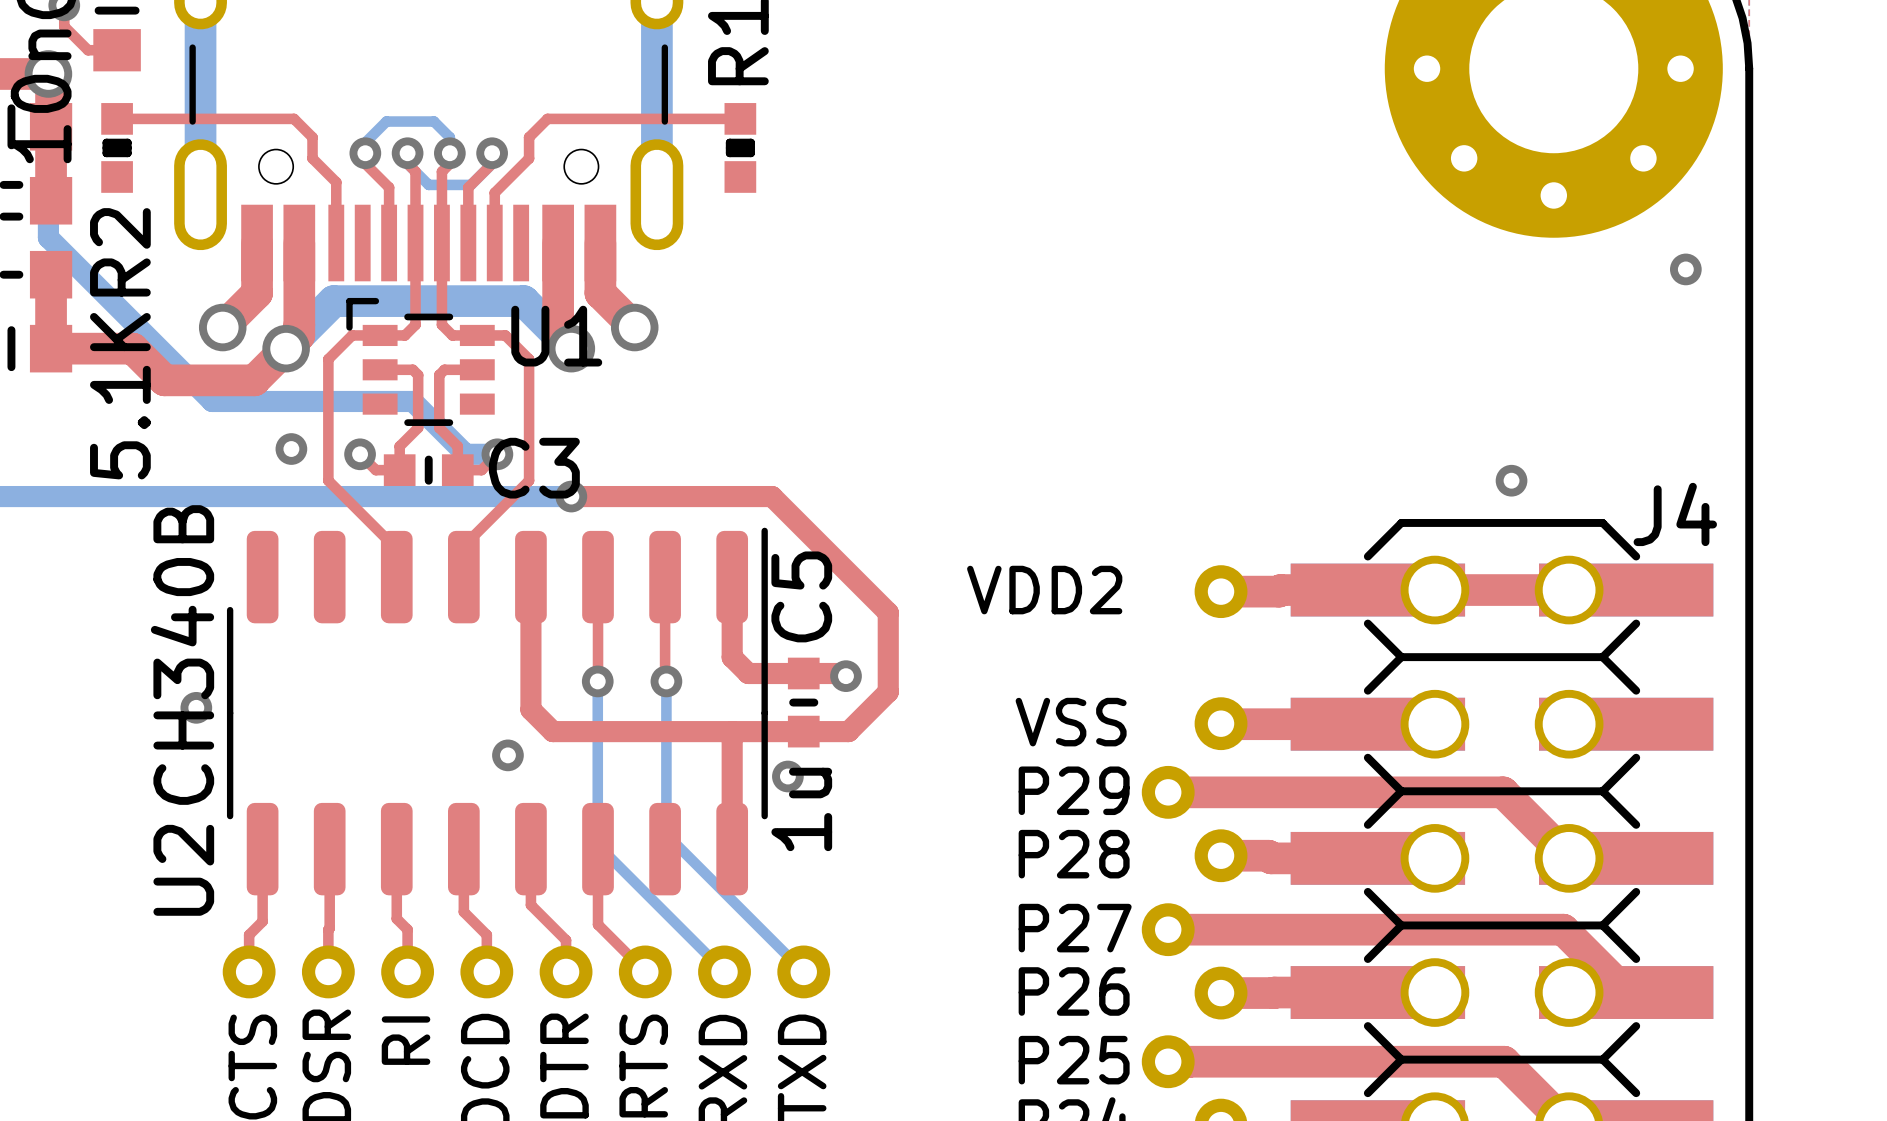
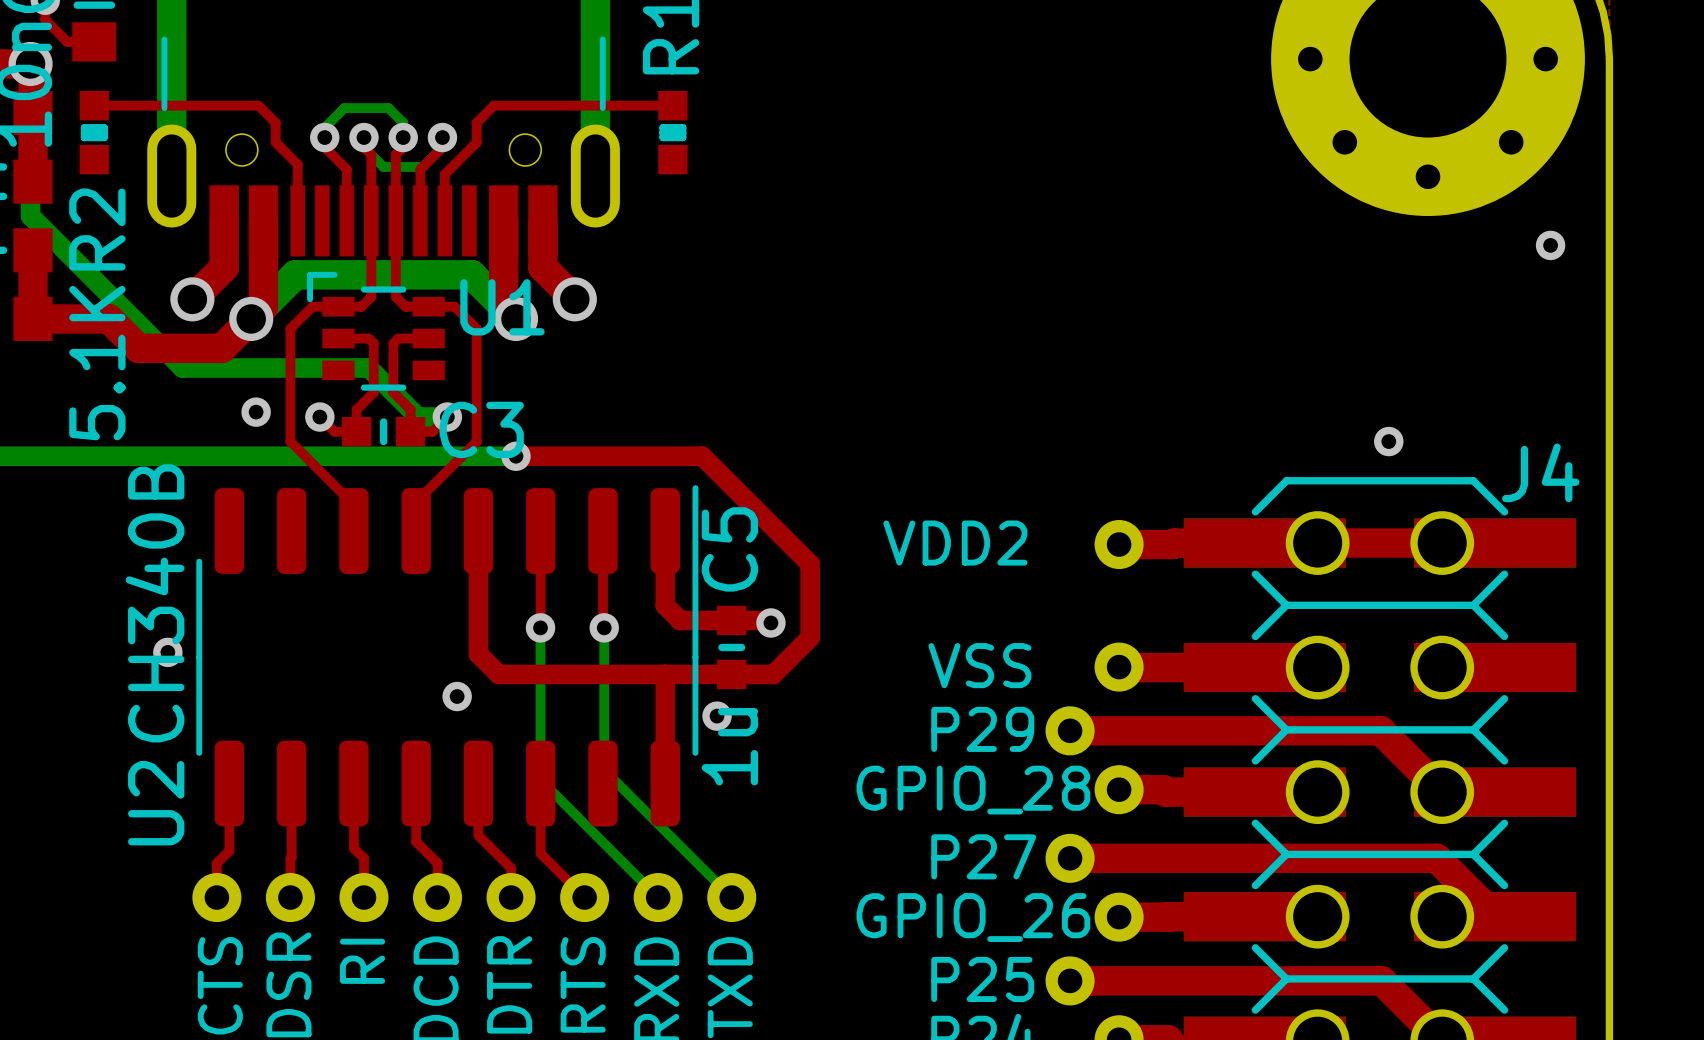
part value: P28 (1074, 854) -> GPIO_28 (973, 790)
part value: P26 (1074, 991) -> GPIO_26 (973, 917)

